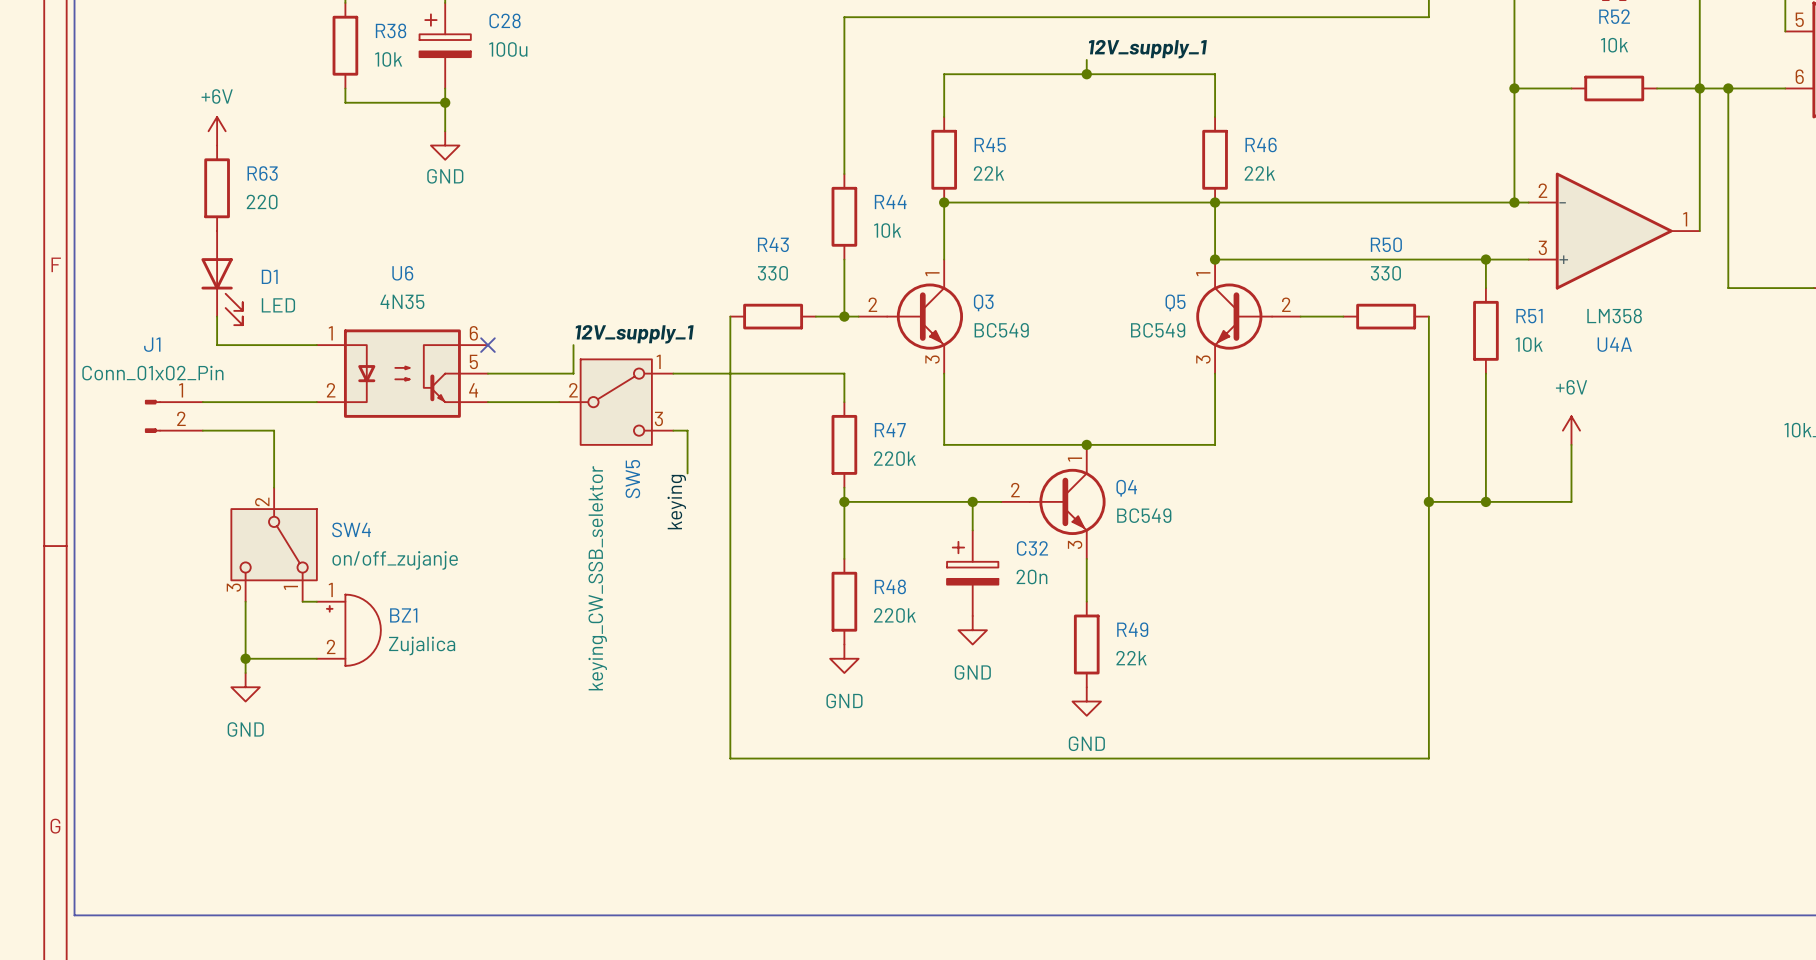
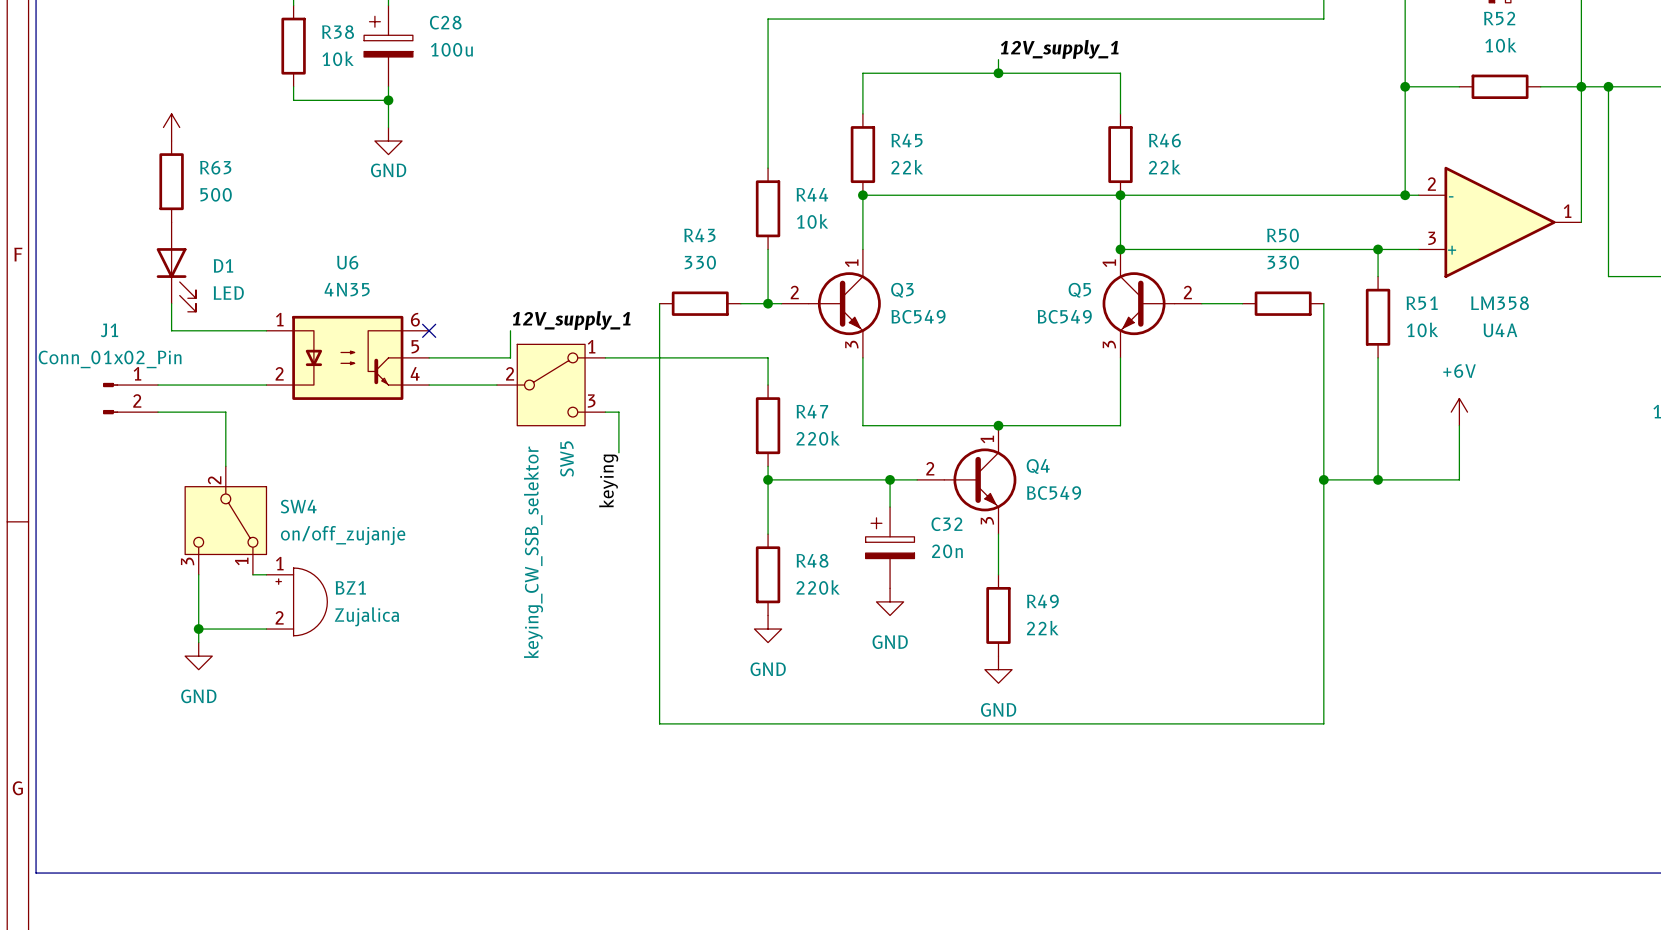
power symbol text: +6V (217, 96) -> none
R63 value: 220 (262, 202) -> 500 (216, 194)

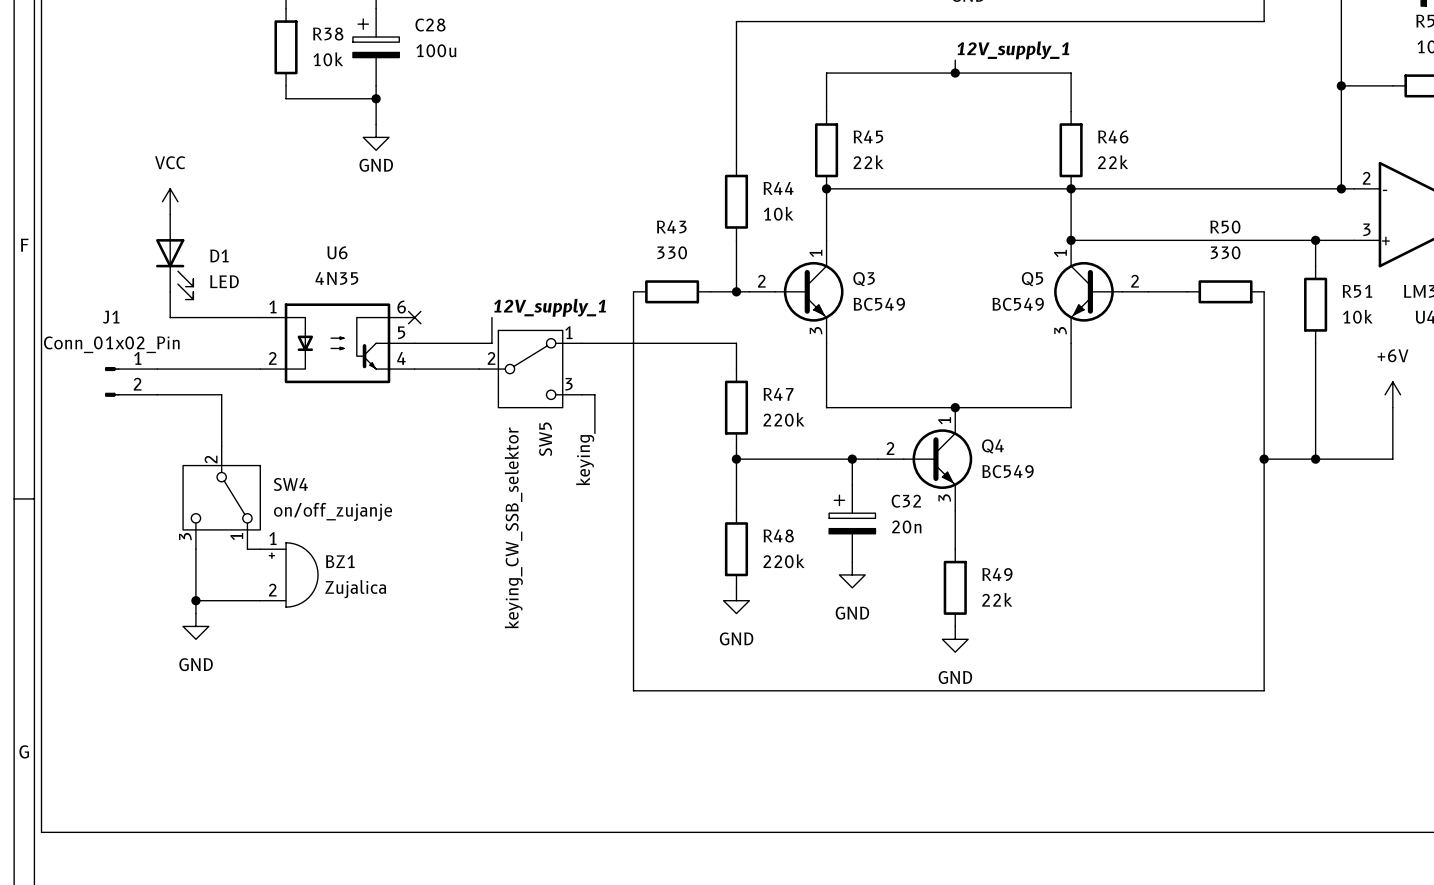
power symbol: (171, 127) -> none
R63: 500 (171, 181) -> none
power symbol: none -> VCC (170, 201)

